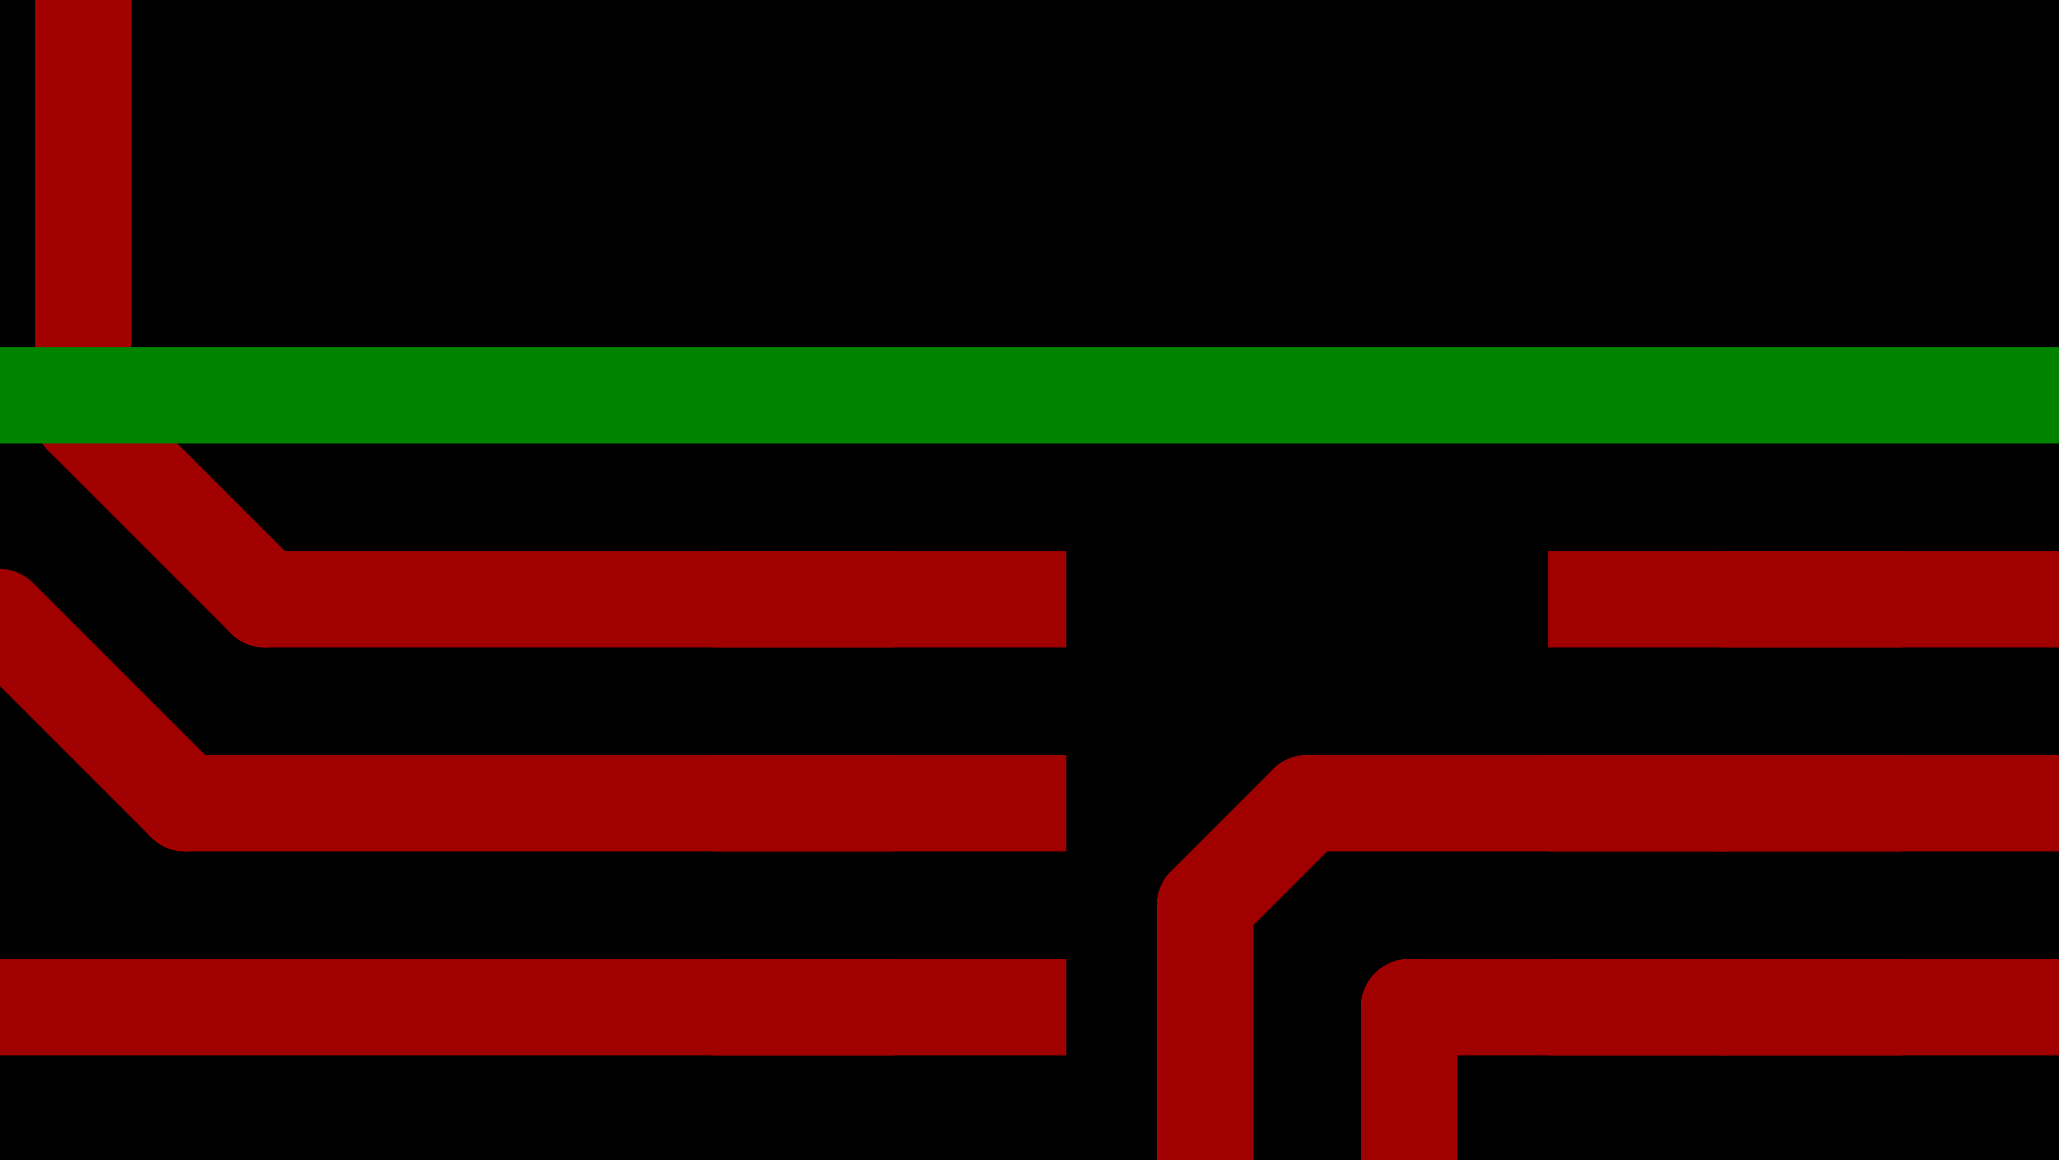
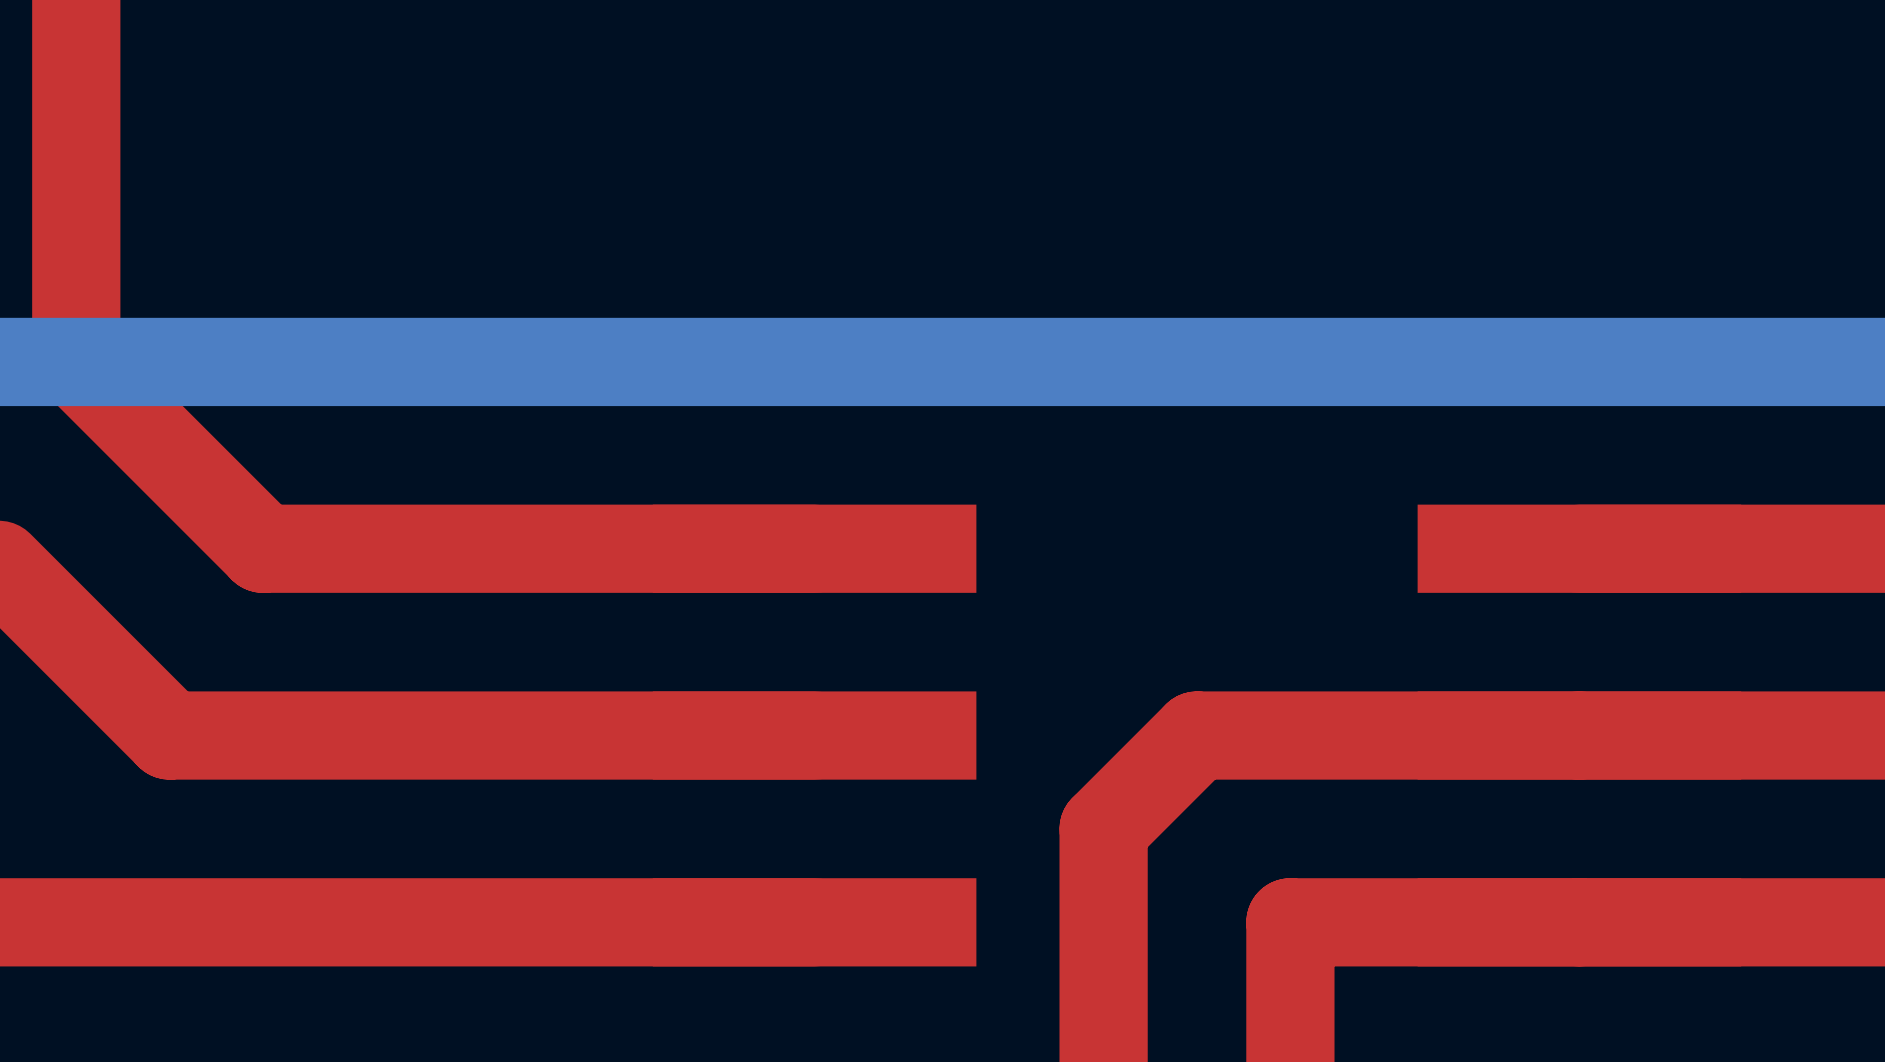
top track: (83, 395) (83, 417) (265, 599) (287, 599) -> (76, 361) (263, 548)

